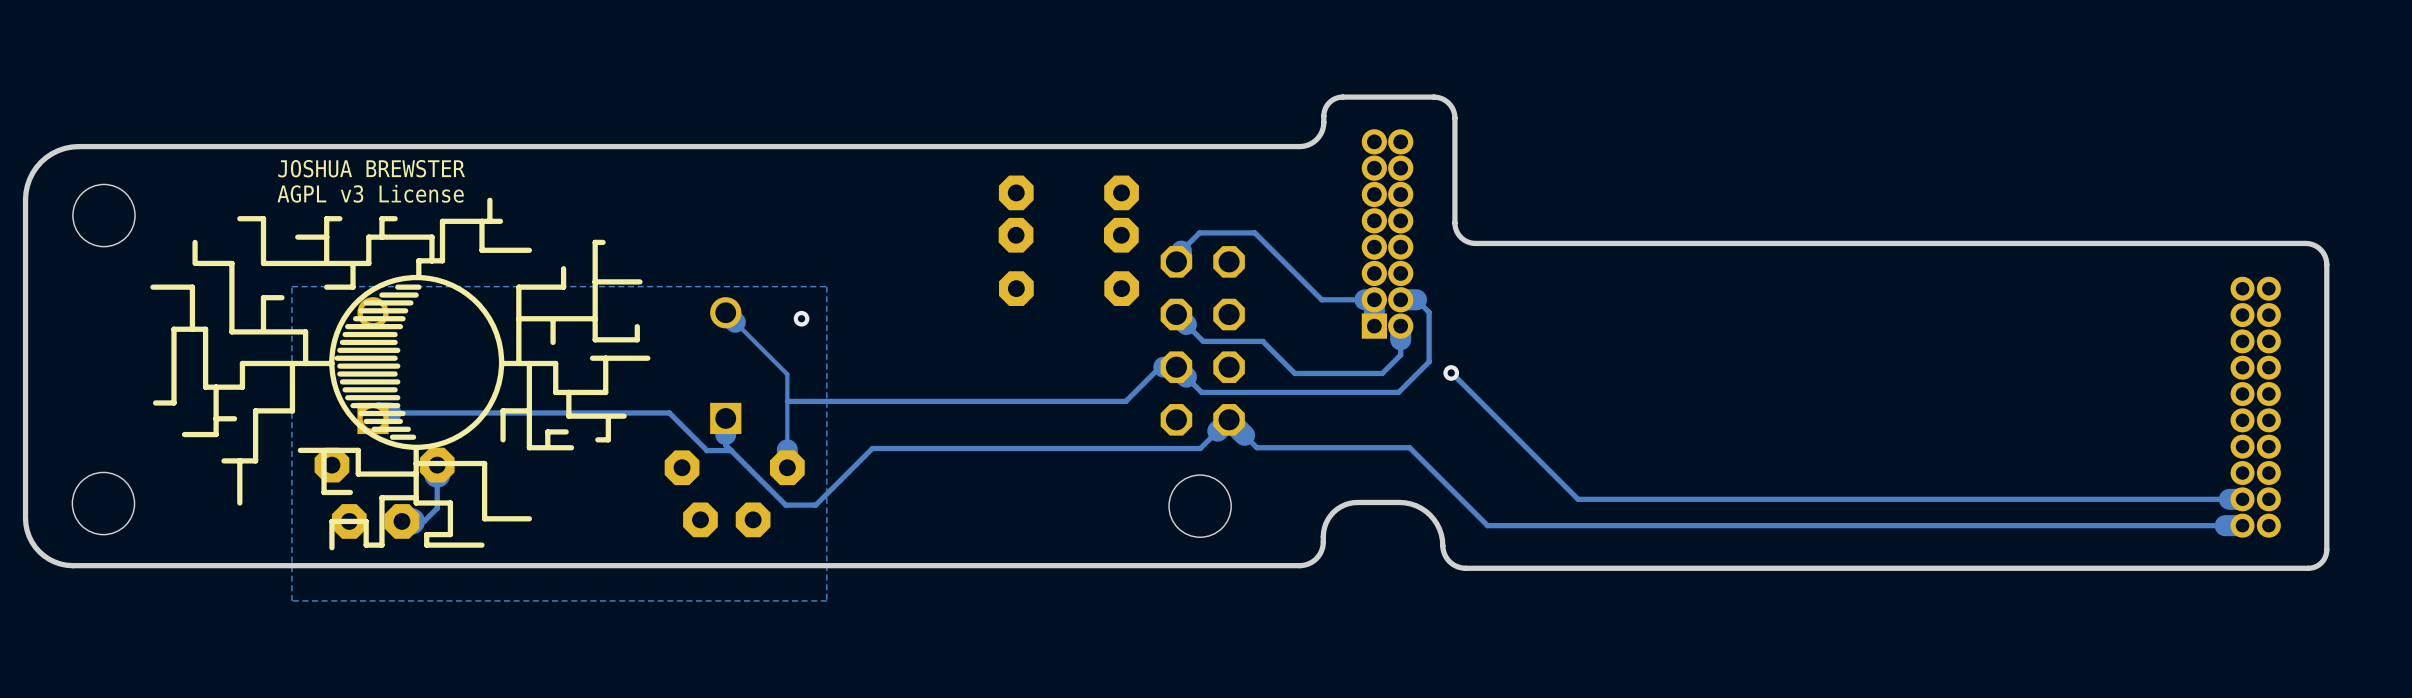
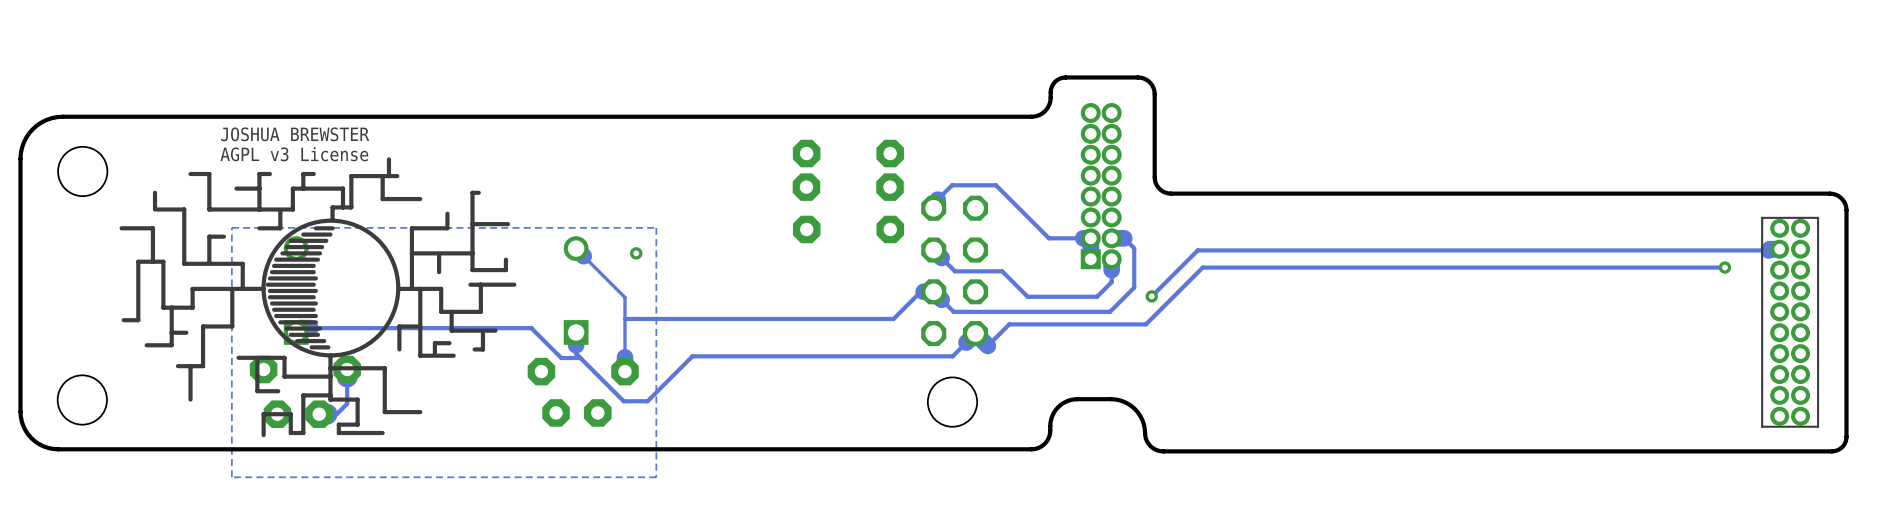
via: none -> (1724, 267)
track: (1451, 372) (1578, 499) (2242, 499) -> (1151, 296) (1197, 250) (1779, 249)
part side: top (2255, 407) -> bottom (1790, 322)
track: (1244, 435) (1256, 447) (1409, 447) (1487, 525) (2242, 525) -> (987, 345) (1009, 324) (1145, 324) (1202, 267) (1724, 267)

